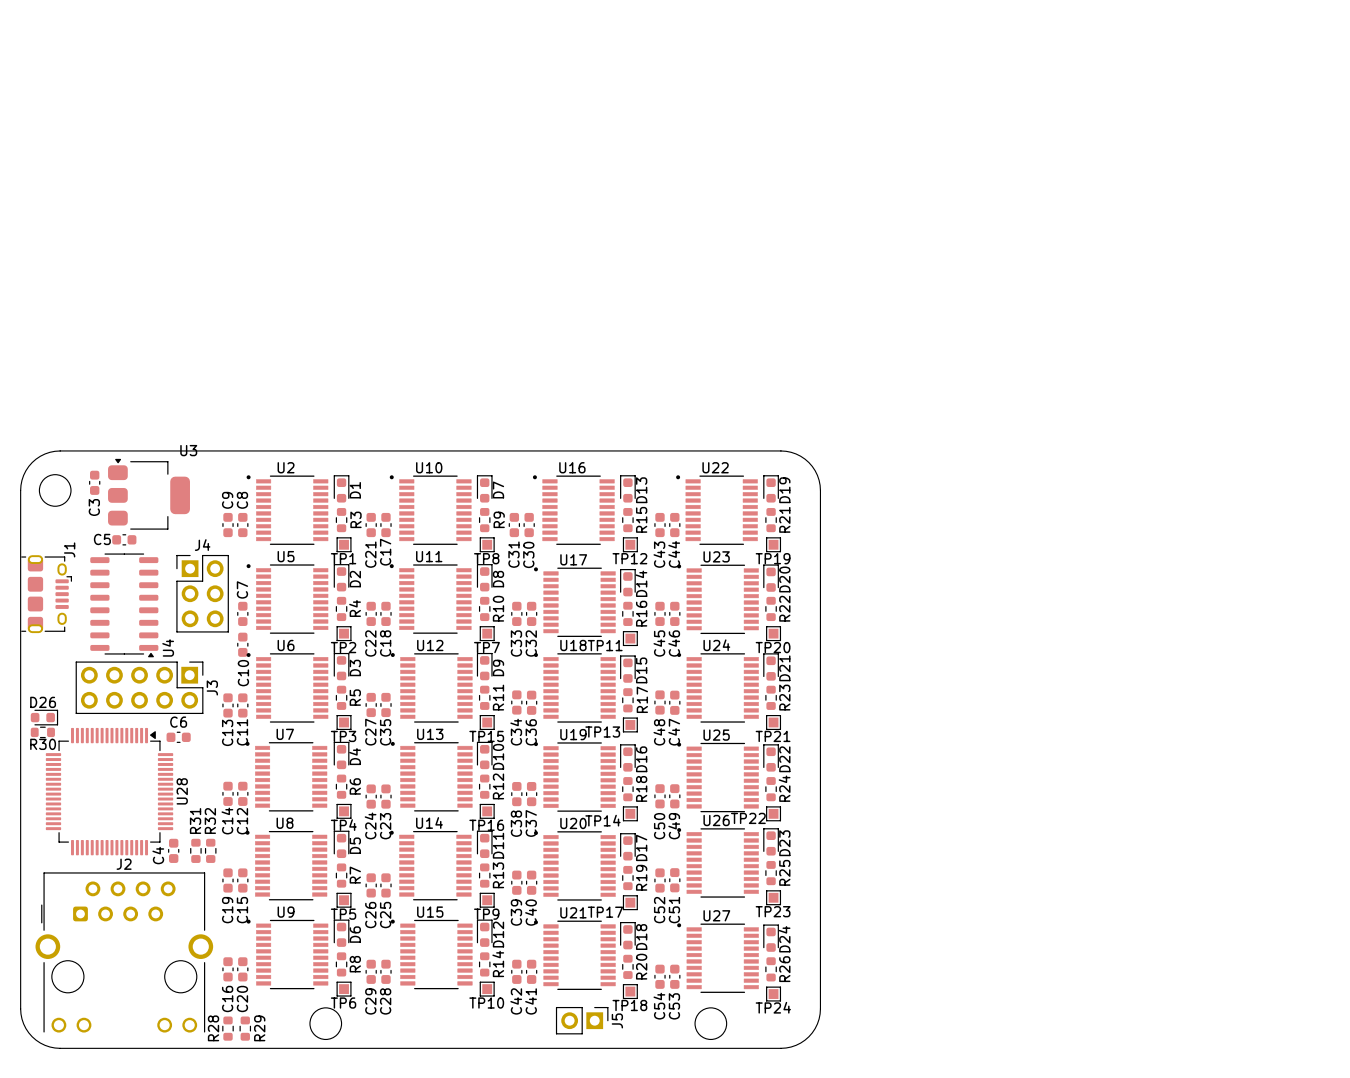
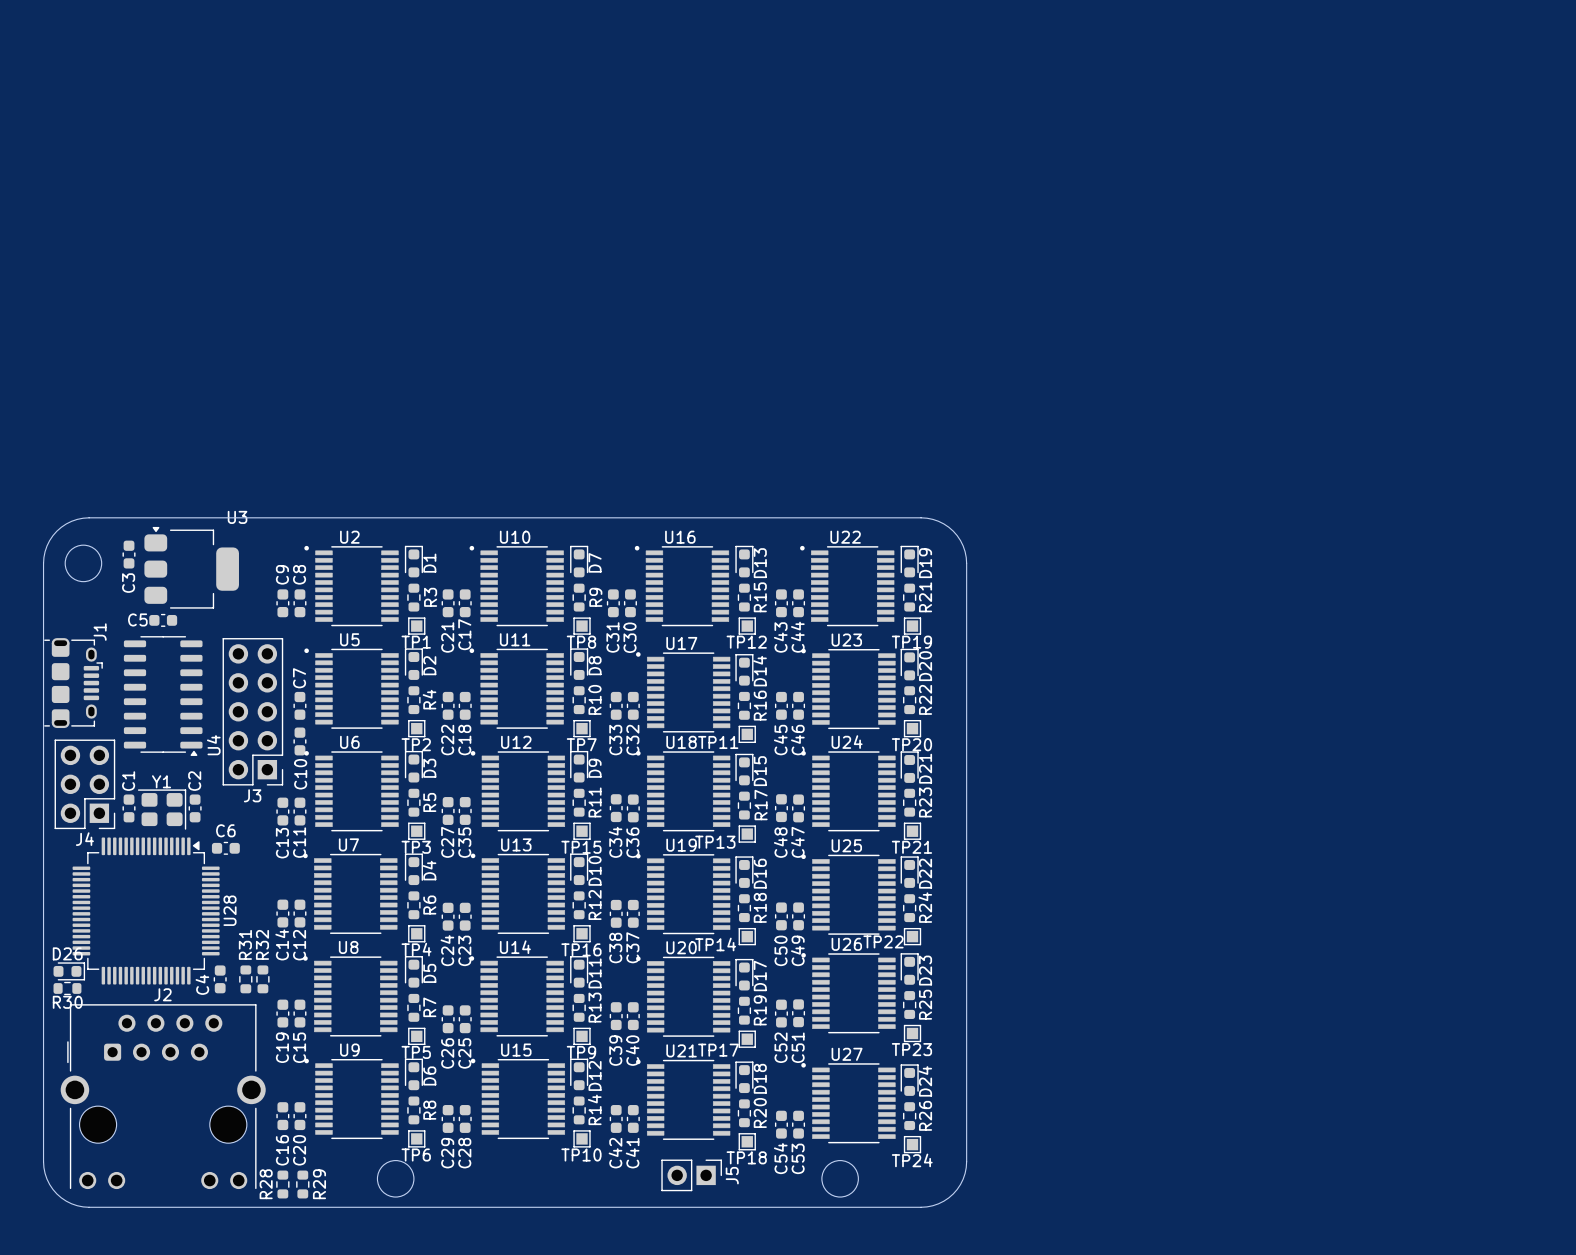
J4 rotation: 0° (202, 593) -> 180° (84, 784)
J4 position: (202, 593) -> (84, 784)
J3 rotation: 0° (139, 687) -> 90° clockwise (252, 711)
J3 position: (139, 687) -> (252, 711)
C1: none -> (129, 808)
C2: none -> (195, 808)
Y1: none -> (162, 809)
D26 position: (44, 717) -> (69, 971)
R30 position: (42, 732) -> (67, 988)

